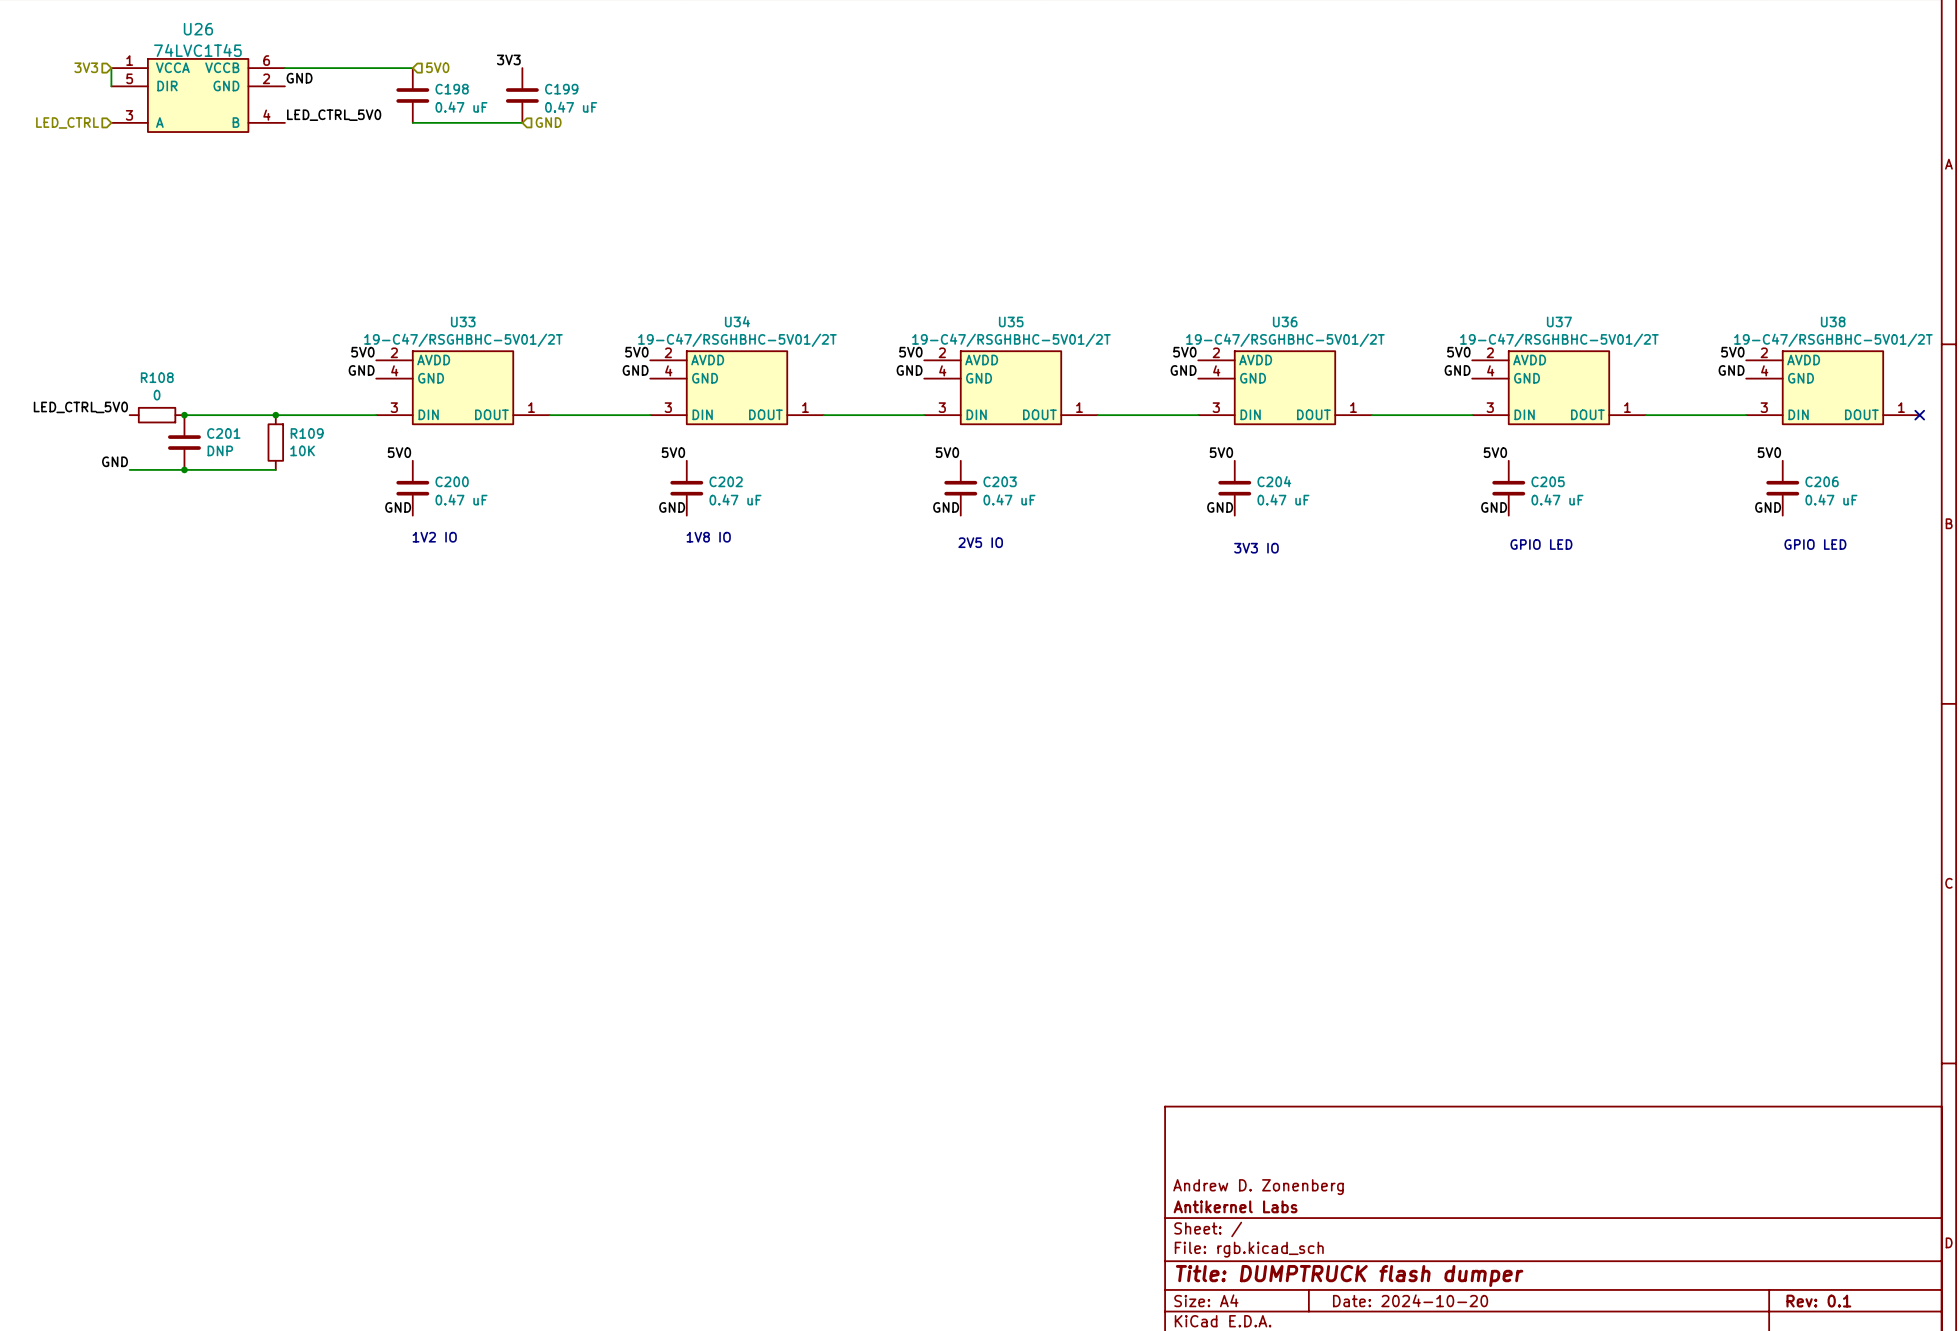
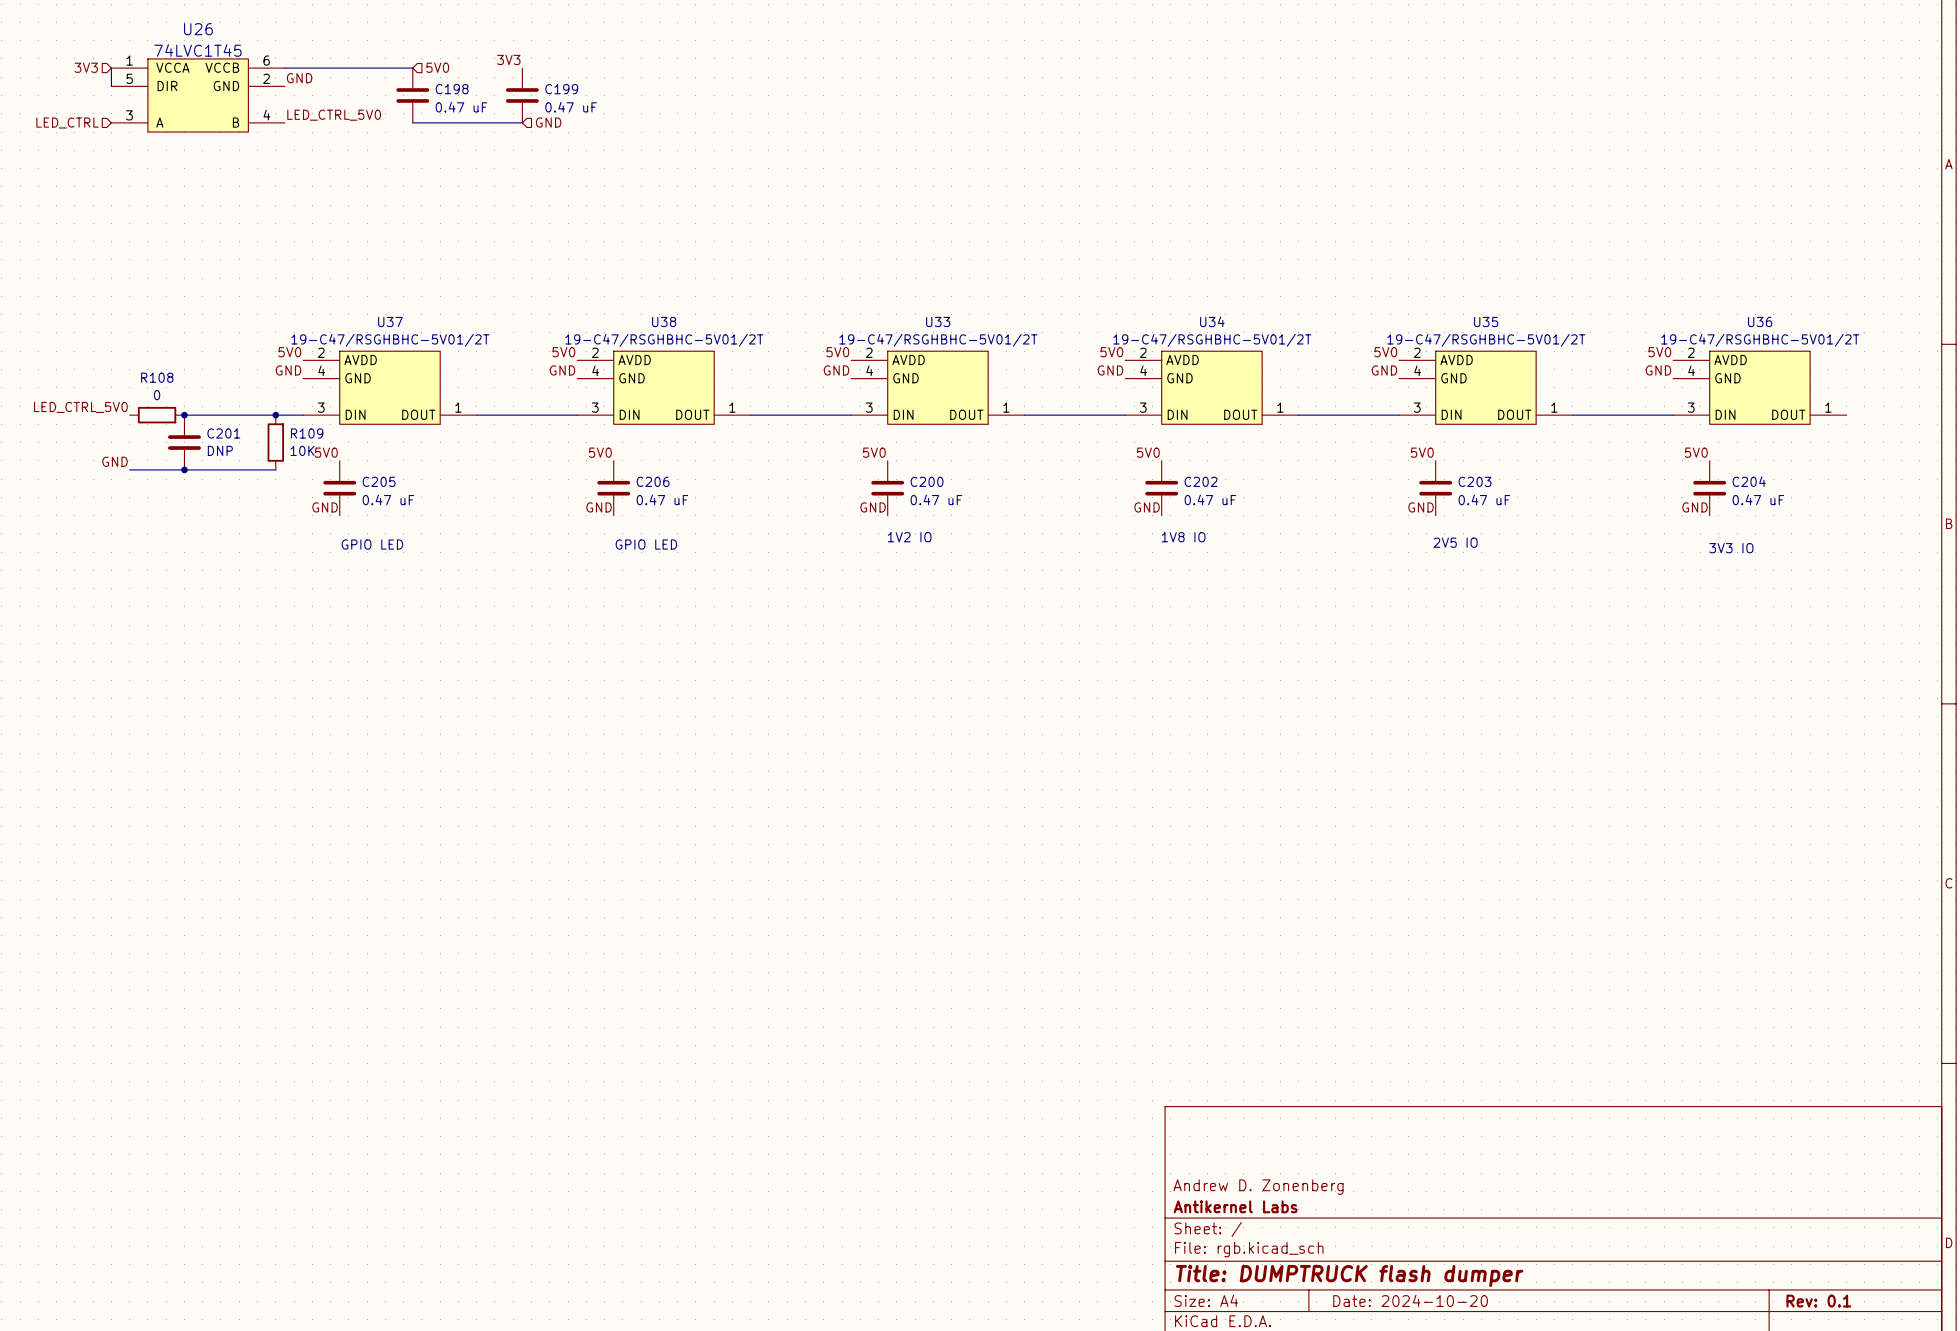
label: none -> 5V0 (289, 352)
label: 5V0 (362, 352) -> none
label: none -> 5V0 (563, 352)
label: 5V0 (636, 352) -> none
label: none -> 5V0 (837, 352)
label: 5V0 (910, 352) -> none
label: none -> 5V0 (1111, 352)
label: 5V0 (1184, 352) -> none
label: none -> 5V0 (1385, 352)
label: 5V0 (1458, 352) -> none
label: none -> 5V0 (1659, 352)
label: 5V0 (1732, 352) -> none
label: none -> GND (288, 370)
label: GND (361, 370) -> none
label: none -> GND (562, 370)
label: GND (635, 370) -> none
label: none -> GND (836, 370)
label: GND (909, 370) -> none
label: none -> GND (1110, 370)
label: GND (1183, 370) -> none
label: none -> GND (1384, 370)
label: GND (1457, 370) -> none
label: none -> GND (1658, 370)
label: GND (1731, 370) -> none
U33 position: (463, 387) -> (937, 387)
U34 position: (737, 387) -> (1211, 387)
U35 position: (1011, 387) -> (1485, 387)
U36 position: (1284, 387) -> (1759, 387)
U37 position: (1558, 387) -> (389, 387)
U38 position: (1832, 387) -> (663, 387)
no-connect mark: (1919, 415) -> none
label: none -> 5V0 (326, 452)
label: 5V0 (399, 452) -> none
label: none -> 5V0 (600, 452)
label: 5V0 (673, 452) -> none
label: none -> 5V0 (874, 452)
label: 5V0 (947, 452) -> none
label: none -> 5V0 (1148, 452)
label: 5V0 (1221, 452) -> none
label: none -> 5V0 (1422, 452)
label: 5V0 (1495, 452) -> none
label: none -> 5V0 (1696, 452)
label: 5V0 (1769, 452) -> none
C200 position: (412, 488) -> (887, 488)
C202 position: (686, 488) -> (1161, 488)
C203 position: (960, 488) -> (1435, 488)
C204 position: (1234, 488) -> (1709, 488)
C205 position: (1508, 488) -> (339, 488)
C206 position: (1782, 488) -> (613, 488)
label: none -> GND (325, 507)
label: GND (398, 507) -> none
label: none -> GND (599, 507)
label: GND (672, 507) -> none
label: none -> GND (873, 507)
label: GND (946, 507) -> none
label: none -> GND (1147, 507)
label: GND (1220, 507) -> none
label: none -> GND (1421, 507)
label: GND (1494, 507) -> none
label: none -> GND (1695, 507)
label: GND (1768, 507) -> none
text: 1V2 IO (434, 537) -> none
text: 1V8 IO (708, 537) -> none
text: none -> 1V2 IO (909, 537)
text: none -> 1V8 IO (1183, 537)
text: 2V5 IO (980, 542) -> none
text: none -> 2V5 IO (1455, 542)
text: none -> GPIO LED (372, 544)
text: none -> GPIO LED (646, 544)
text: GPIO LED (1541, 544) -> none
text: GPIO LED (1815, 544) -> none
text: 3V3 IO (1256, 548) -> none
text: none -> 3V3 IO (1731, 548)

